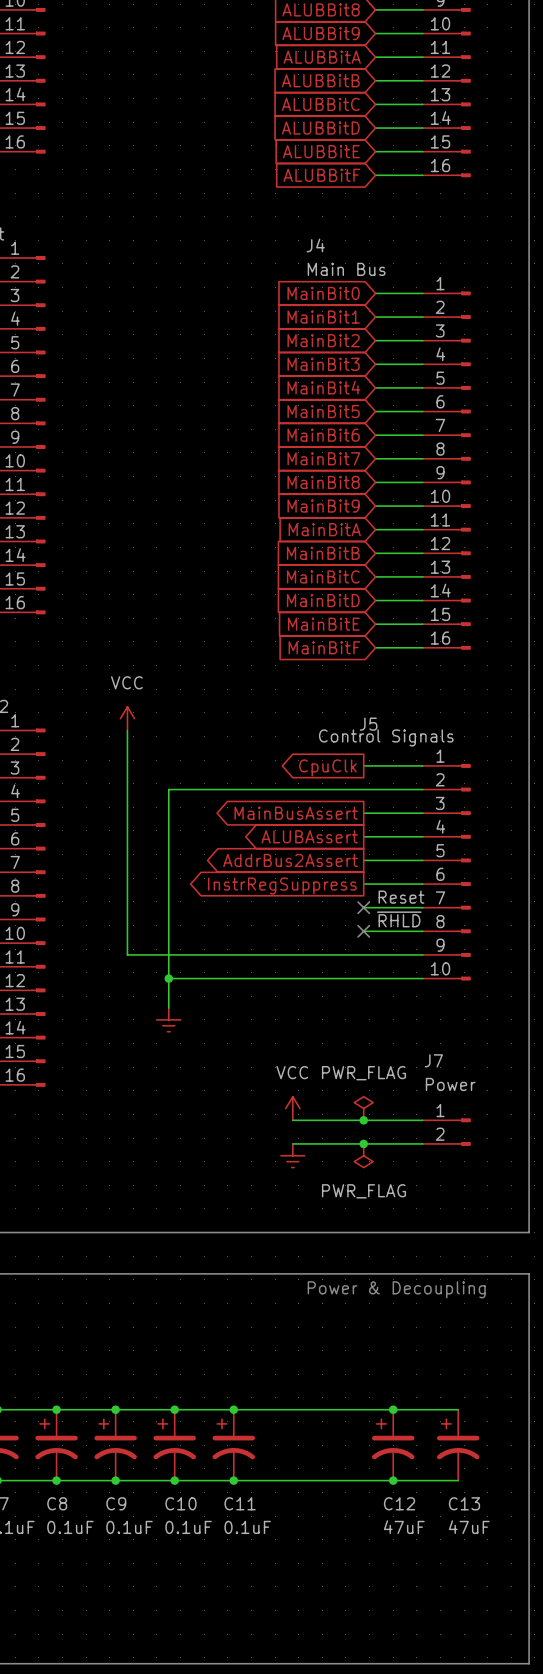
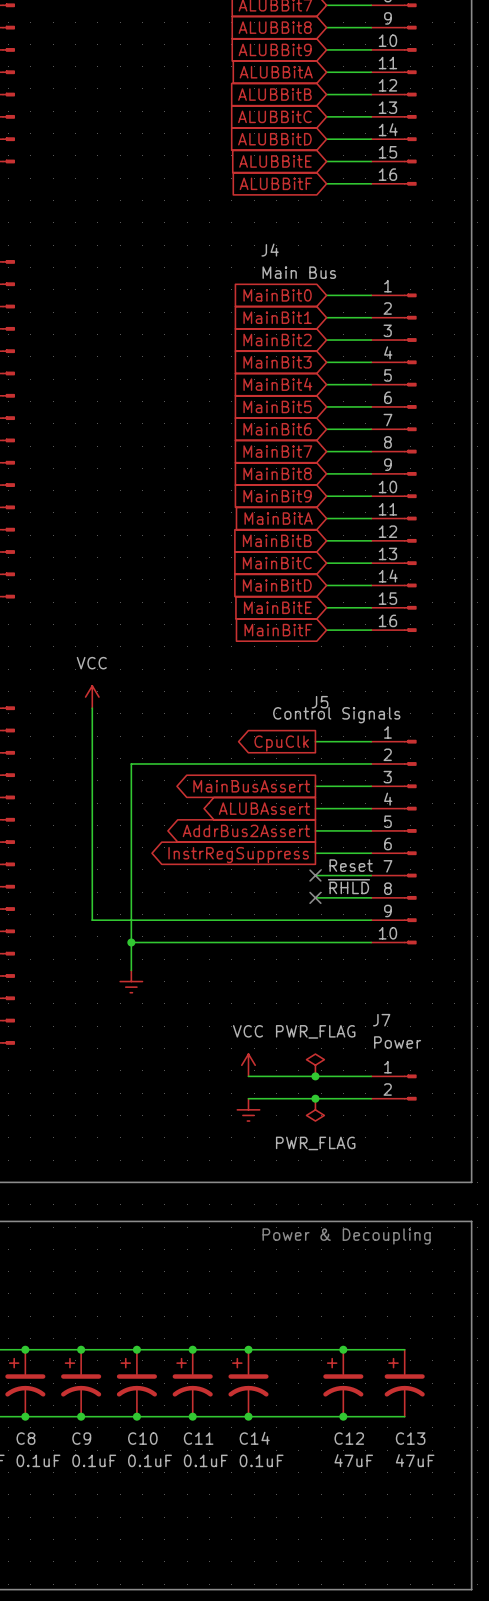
junction: none -> (248, 1349)
C14: none -> 0.1uF (248, 1383)
junction: none -> (248, 1416)

